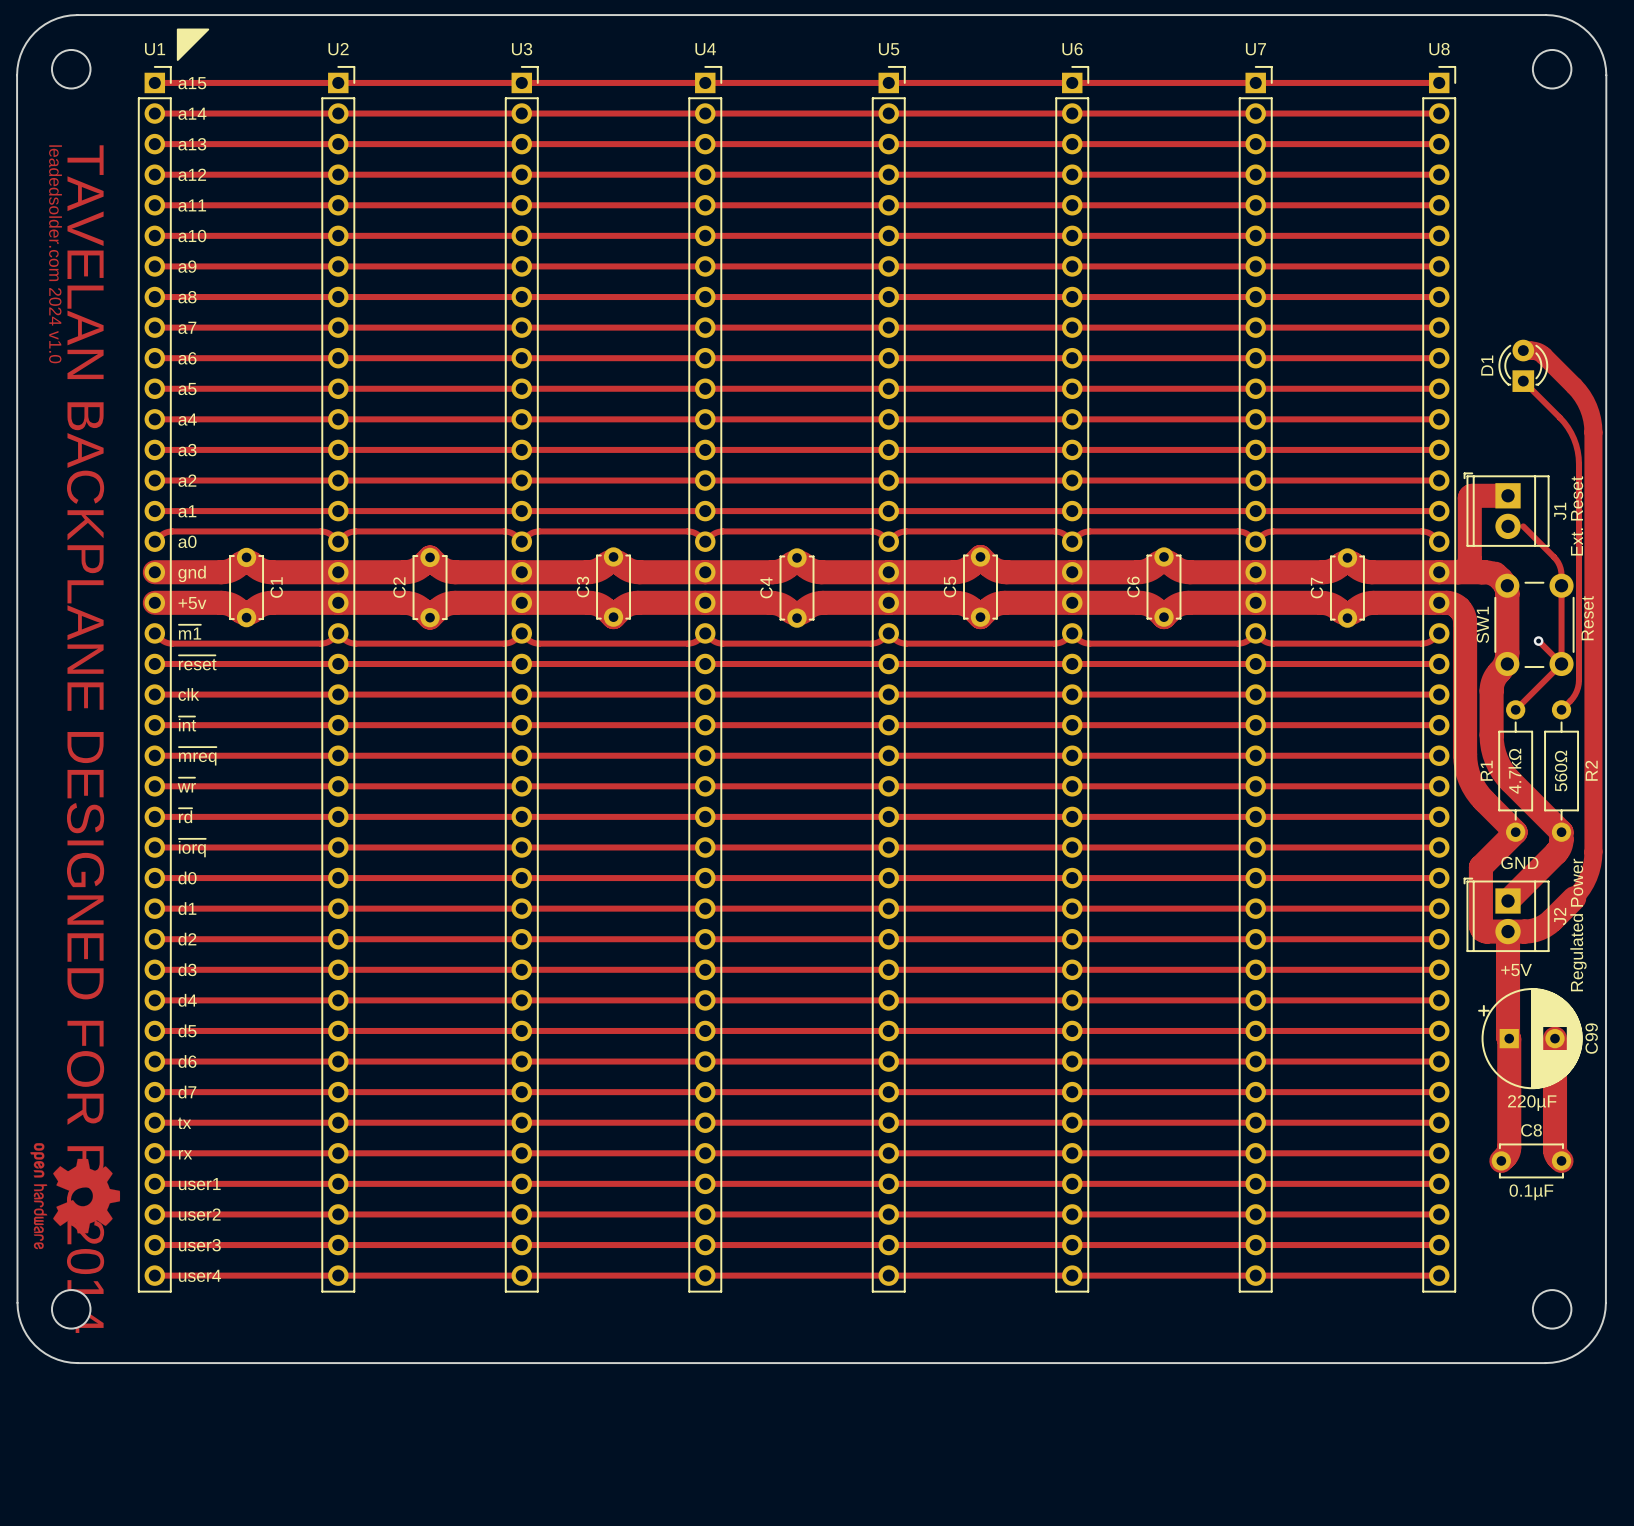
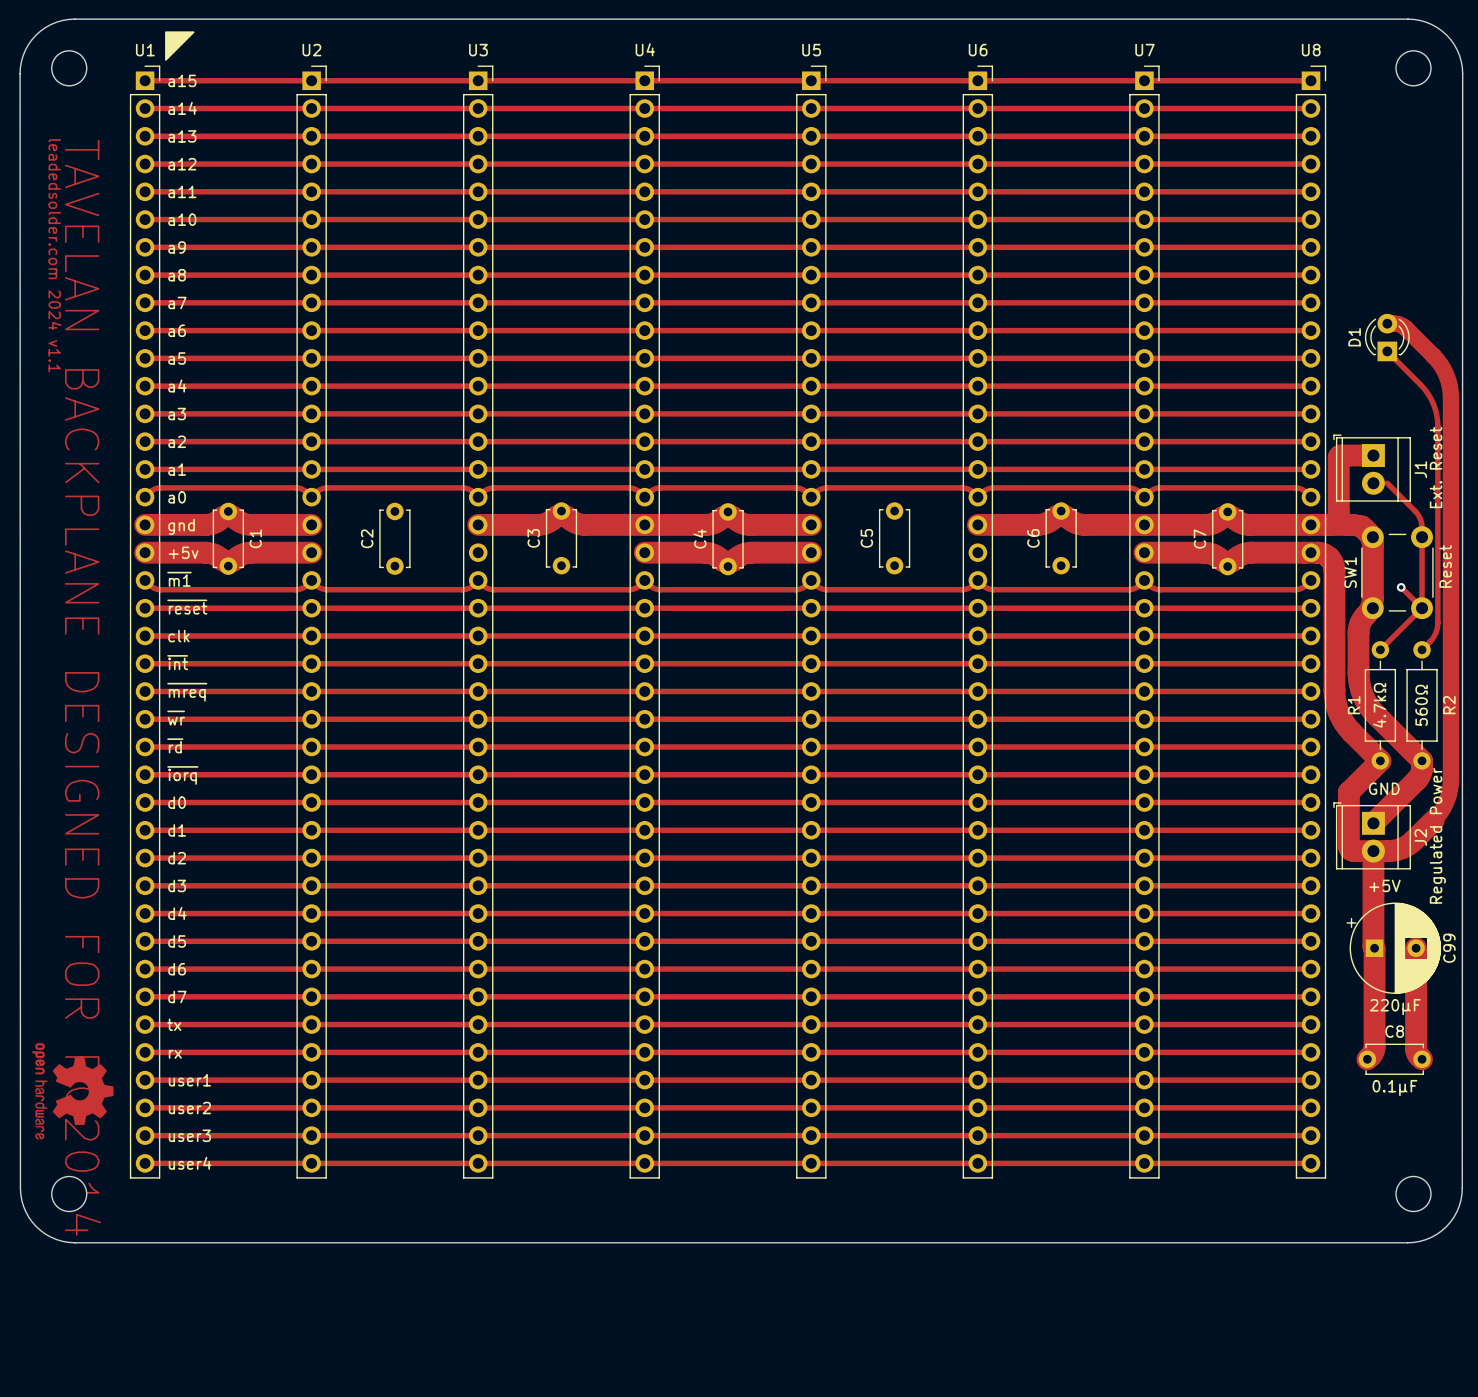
text: leadedsolder.com 2024 v1.0 (55, 254) -> leadedsolder.com 2024 v1.1 (54, 255)
track: (338, 572) (408, 572) (417, 568) (430, 557) (442, 568) (452, 572) (521, 572) -> none
track: (888, 572) (957, 572) (967, 568) (980, 556) (993, 568) (1003, 572) (1072, 572) -> none
track: (338, 602) (408, 603) (417, 606) (430, 617) (441, 607) (452, 602) (591, 602) (602, 606) (613, 617) (624, 606) (633, 603) (705, 602) -> none
track: (888, 602) (960, 603) (969, 606) (980, 617) (991, 606) (1002, 602) (1141, 602) (1153, 606) (1163, 617) (1174, 606) (1183, 603) (1255, 602) -> none

